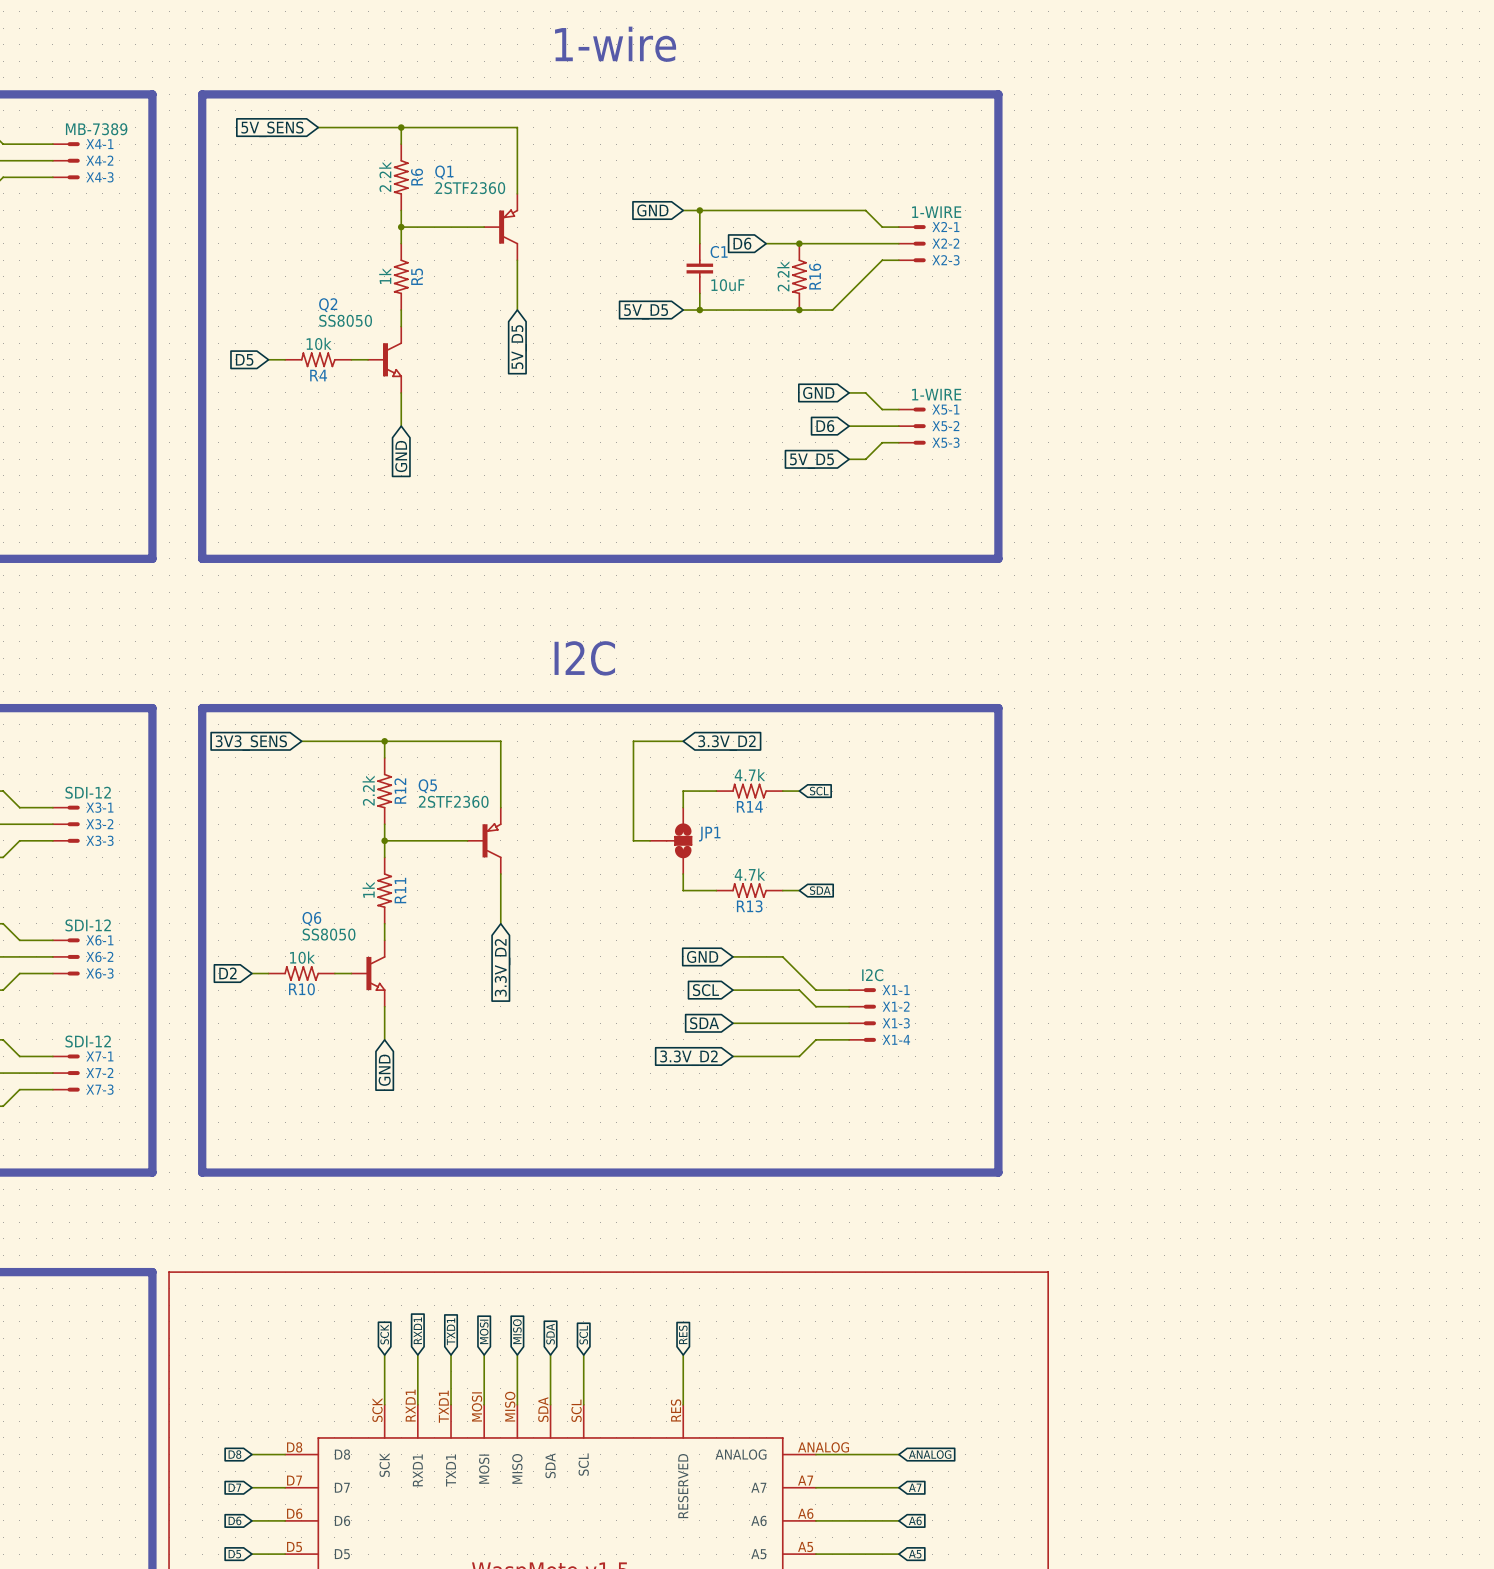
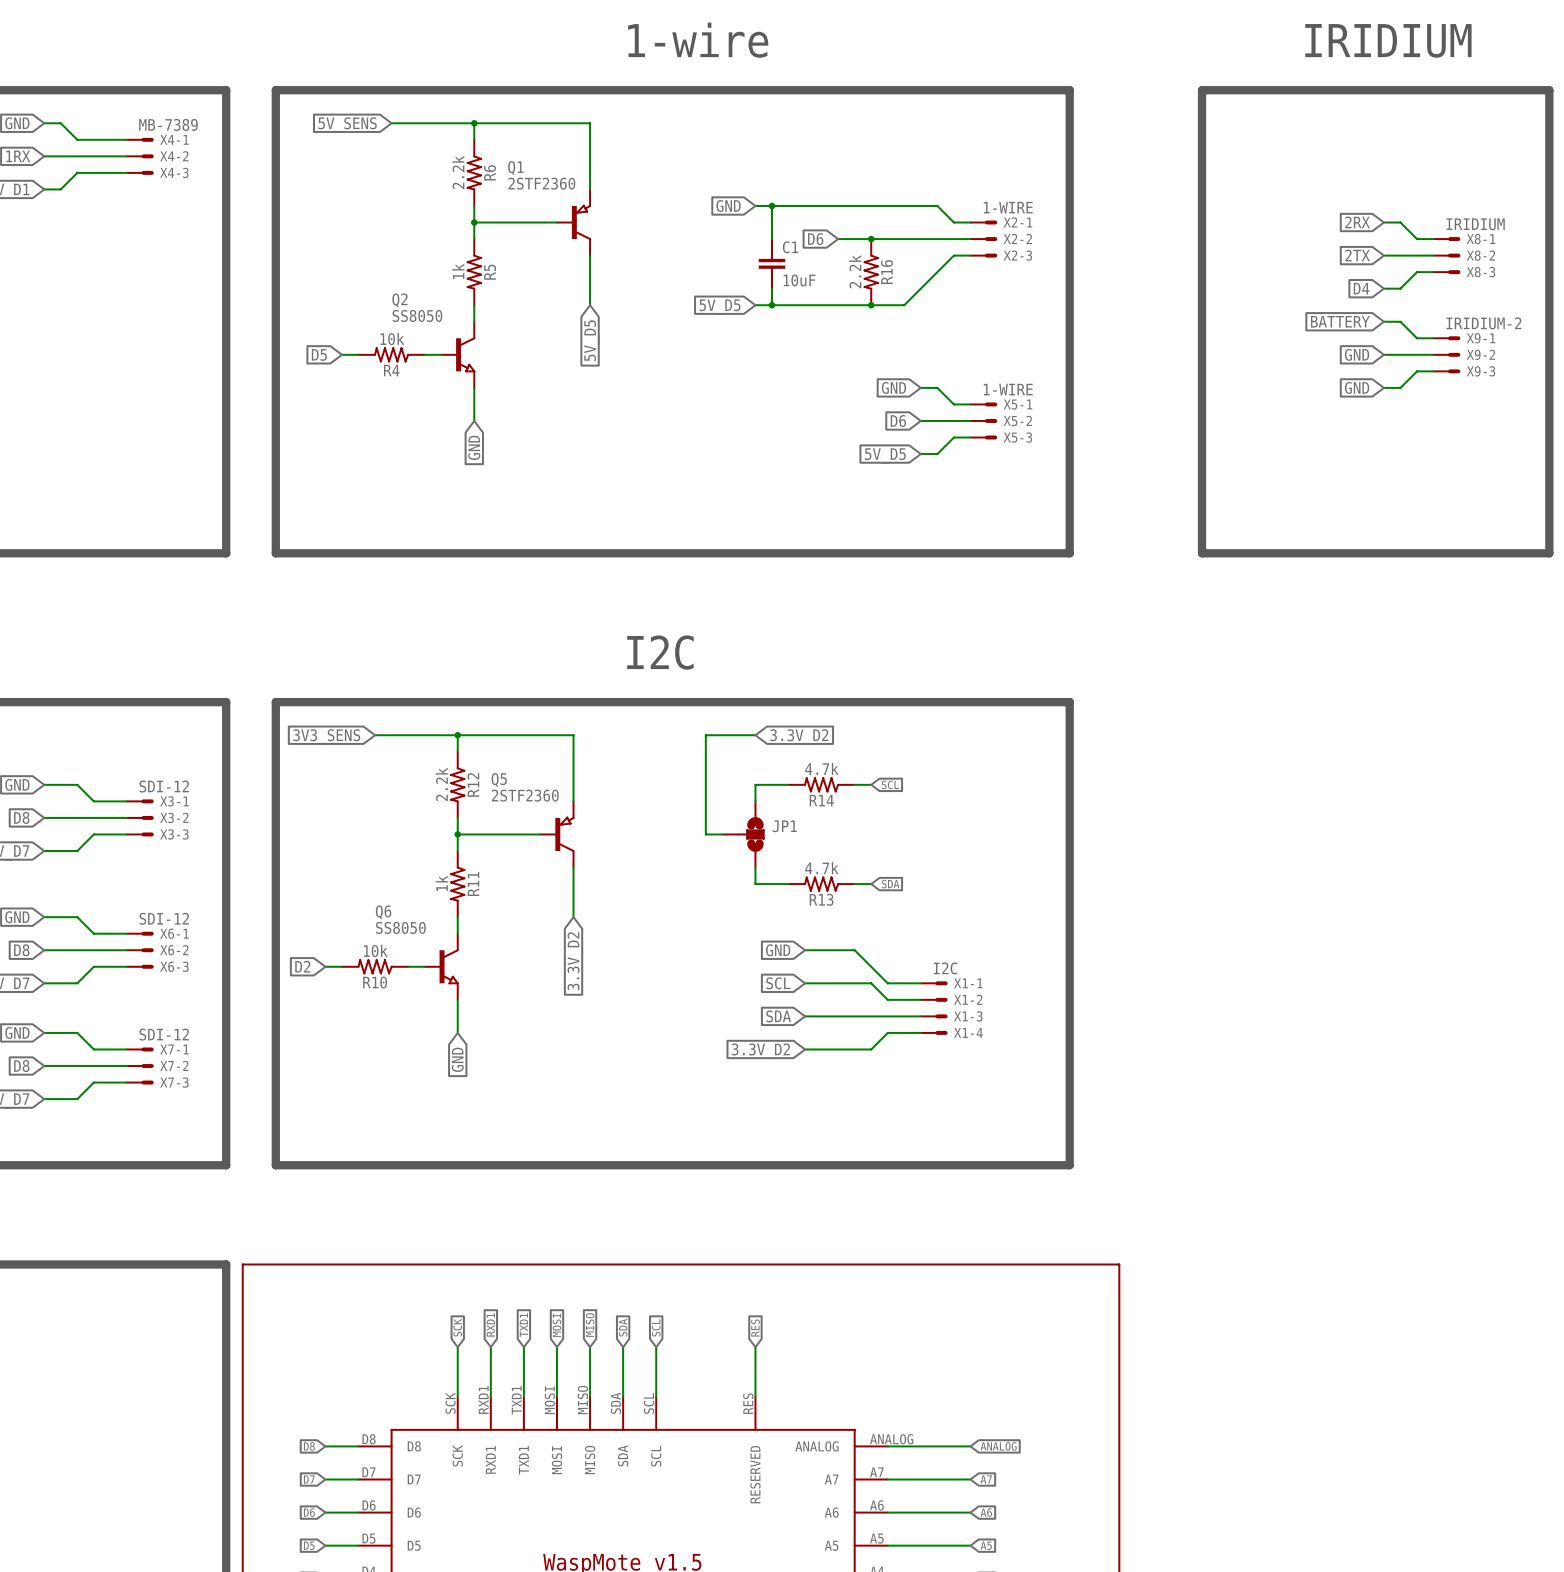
text: none -> IRIDIUM (1388, 40)
line: none -> (1202, 90) (1549, 90) (1549, 553) (1202, 553) (1202, 90)
global label: none -> 2RX (1357, 222)
wire: none -> (1383, 222) (1400, 222) (1417, 239) (1433, 239)
X8-1: none -> IRIDIUM (1446, 239)
global label: none -> 2TX (1357, 255)
wire: none -> (1383, 255) (1433, 255)
X8-2: none -> (1446, 255)
wire: none -> (1433, 272) (1417, 272) (1400, 288) (1383, 288)
X8-3: none -> (1446, 272)
global label: none -> D4 (1361, 288)
global label: none -> BATTERY (1340, 321)
wire: none -> (1383, 321) (1400, 321) (1417, 338) (1433, 338)
X9-1: none -> IRIDIUM-2 (1446, 338)
global label: none -> GND (1357, 354)
wire: none -> (1383, 354) (1433, 354)
X9-2: none -> (1446, 354)
wire: none -> (1433, 371) (1417, 371) (1400, 387) (1383, 387)
X9-3: none -> (1446, 371)
global label: none -> GND (1357, 387)

